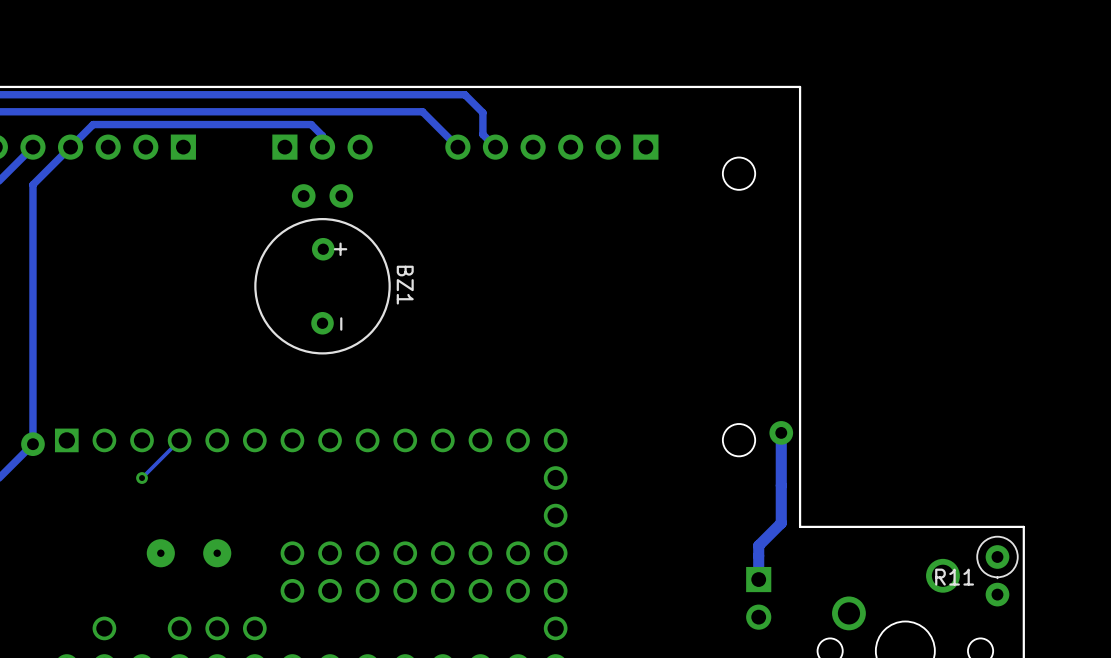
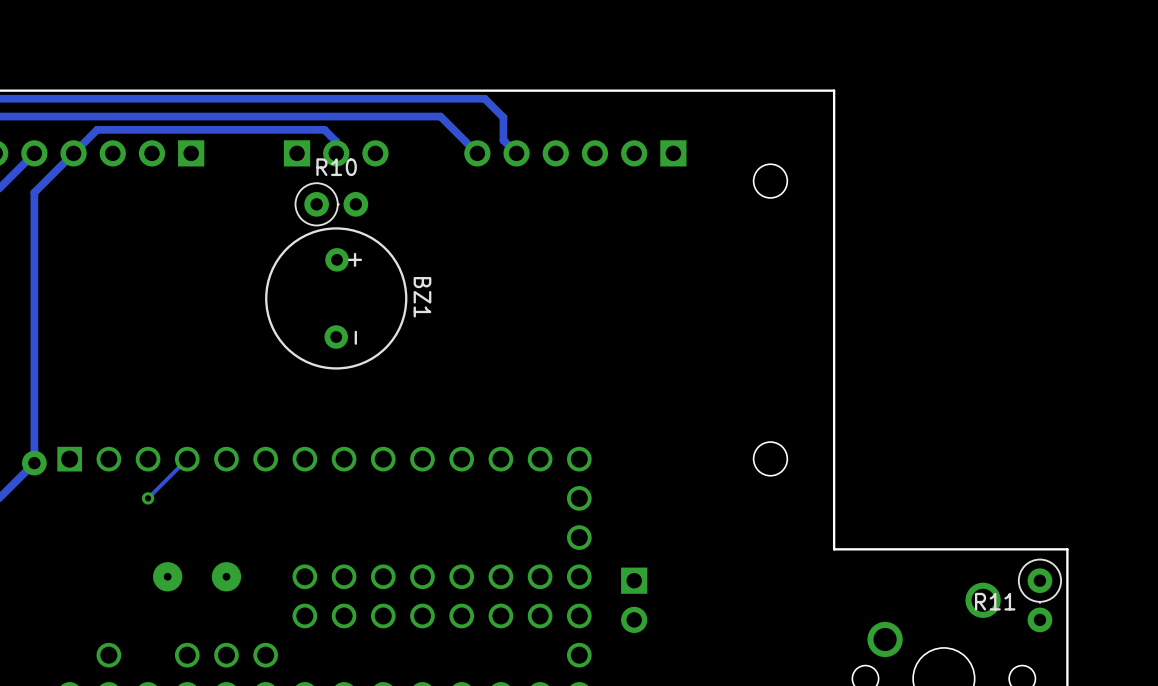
R10 side: top (322, 196) -> bottom (331, 204)
track: (781, 432) (781, 523) (758, 545) (758, 579) -> none
via: (781, 432) -> none
part position: (758, 598) -> (634, 600)

